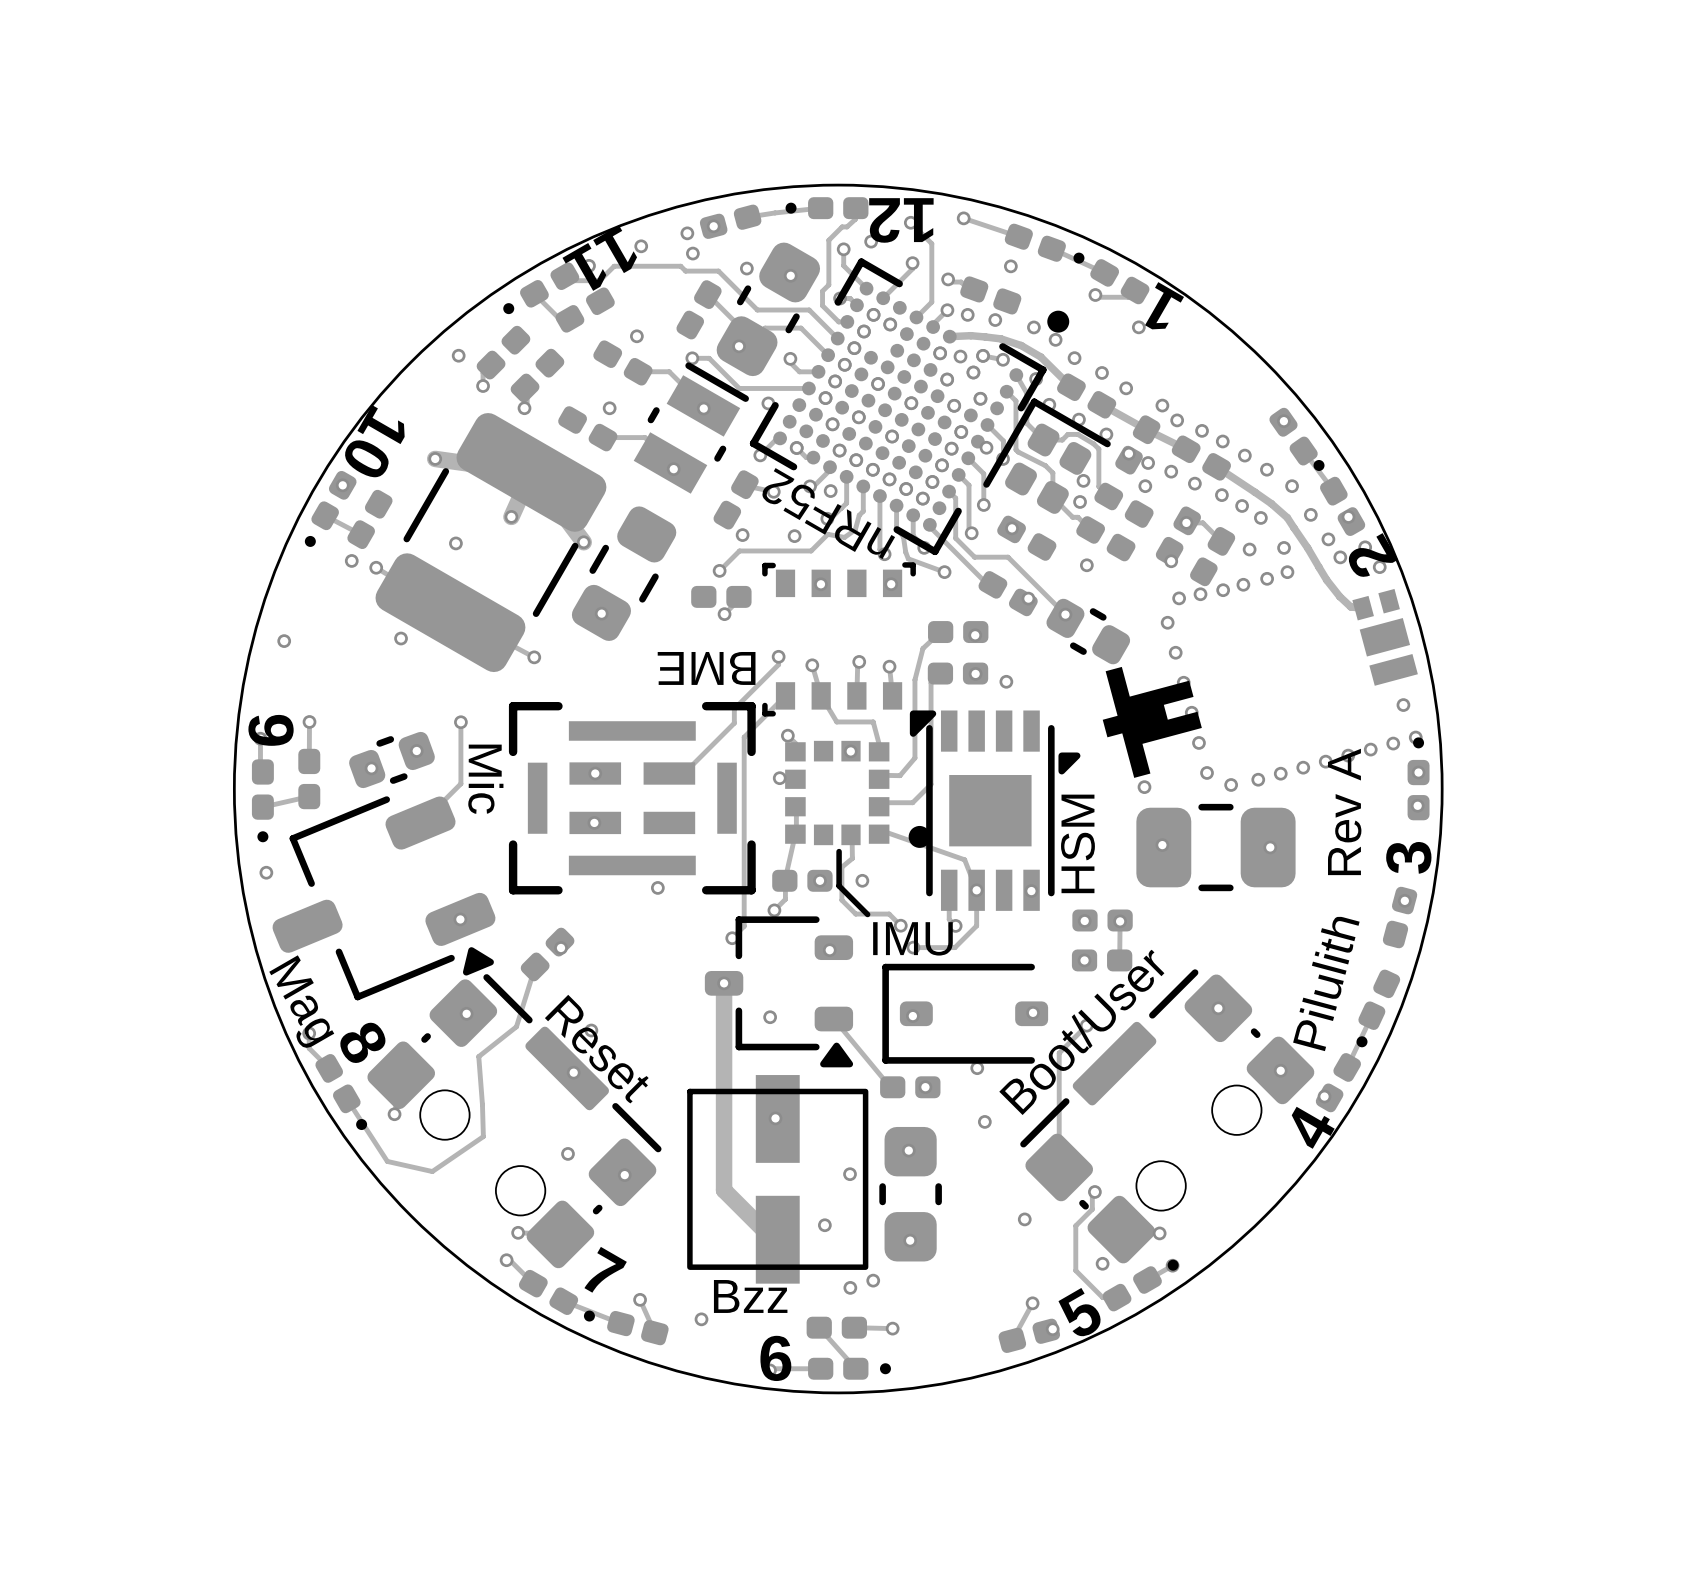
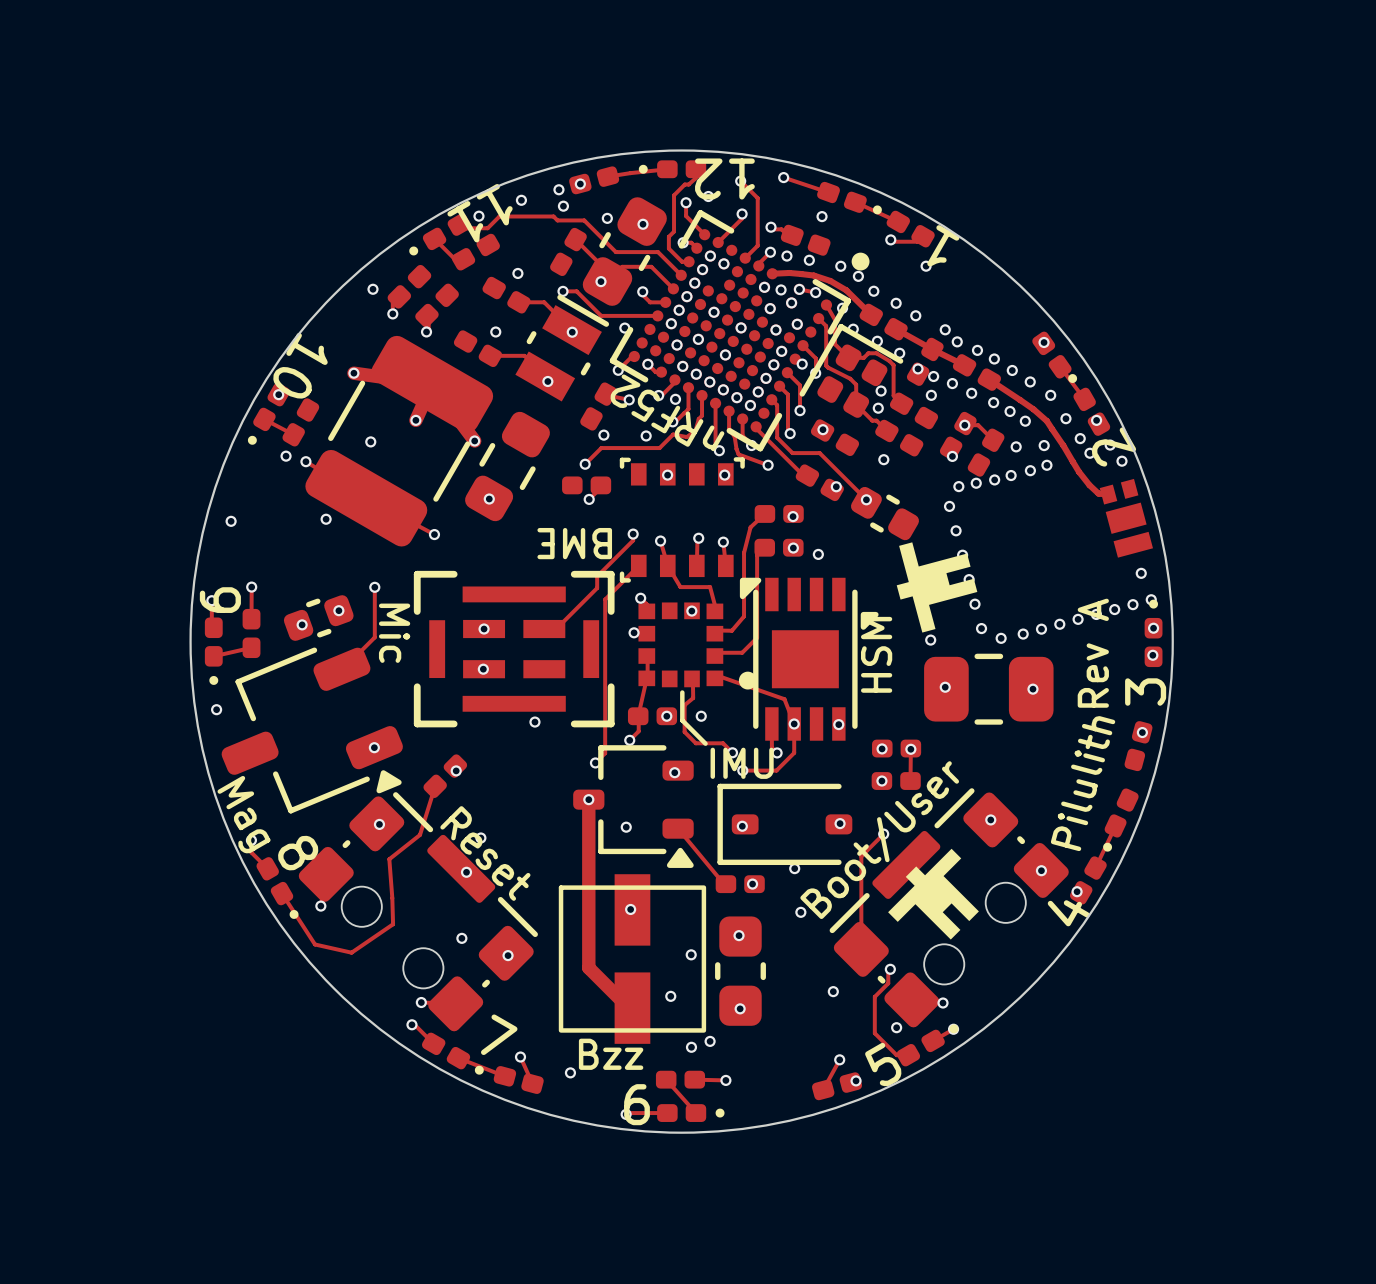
text position: HSM (1077, 843) -> HSM (876, 654)
drawing: none -> [888, 848, 979, 940]

